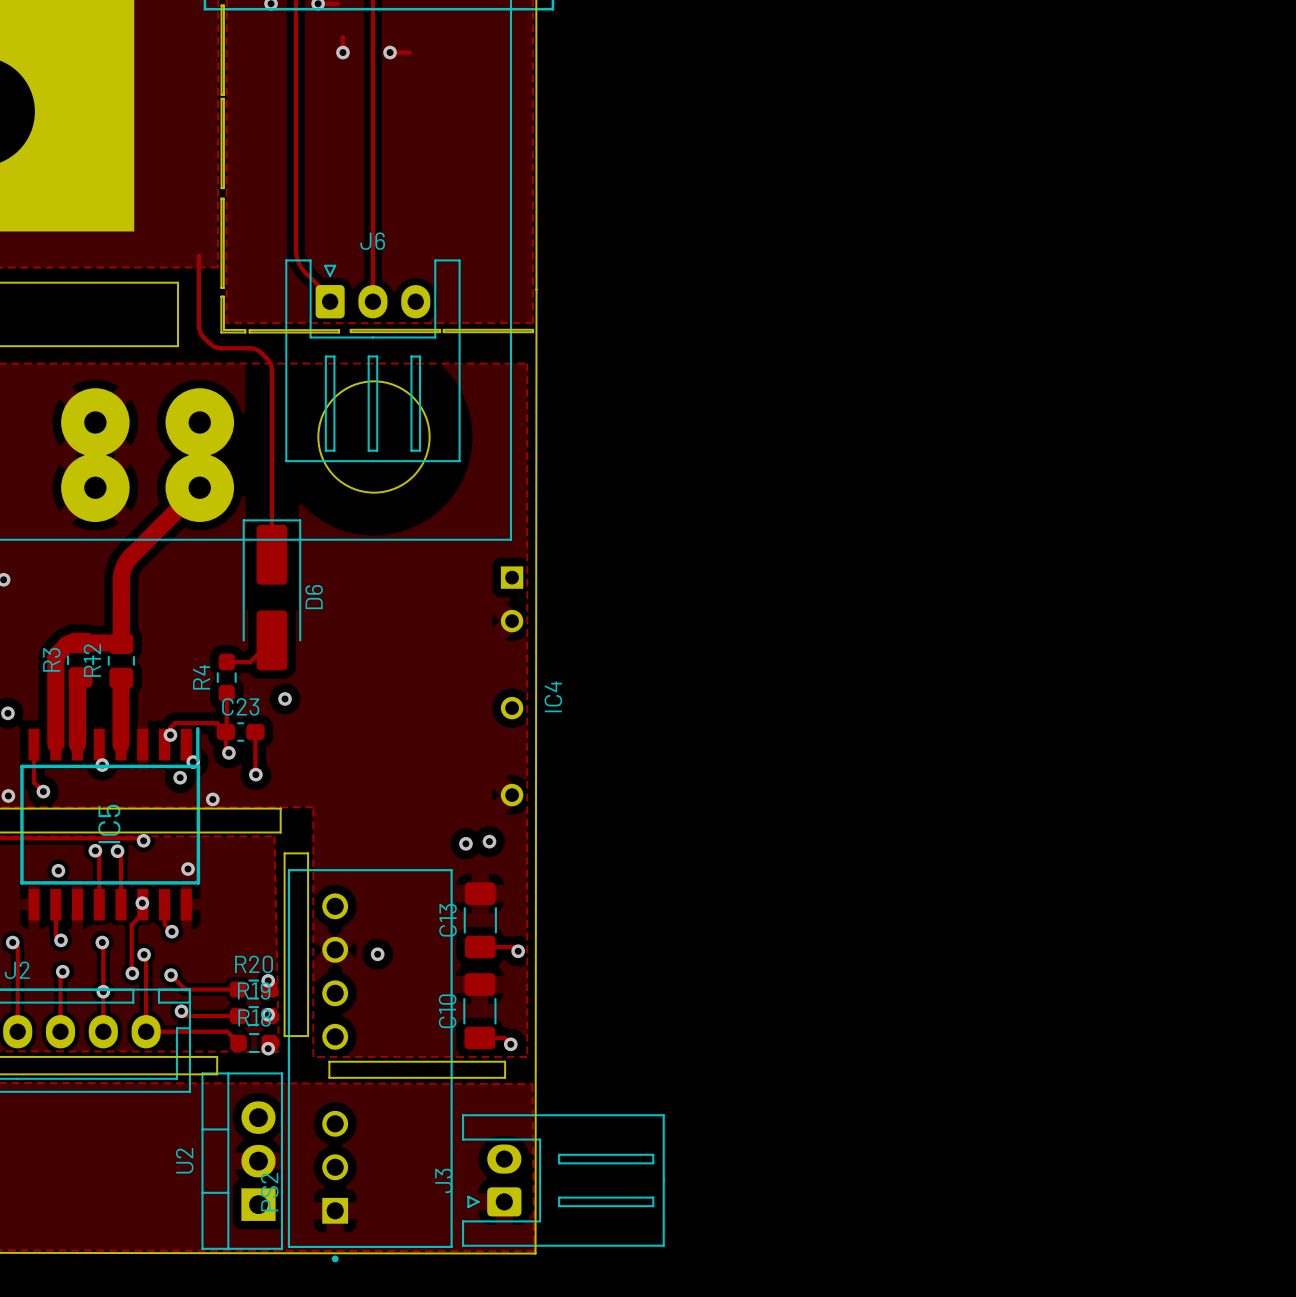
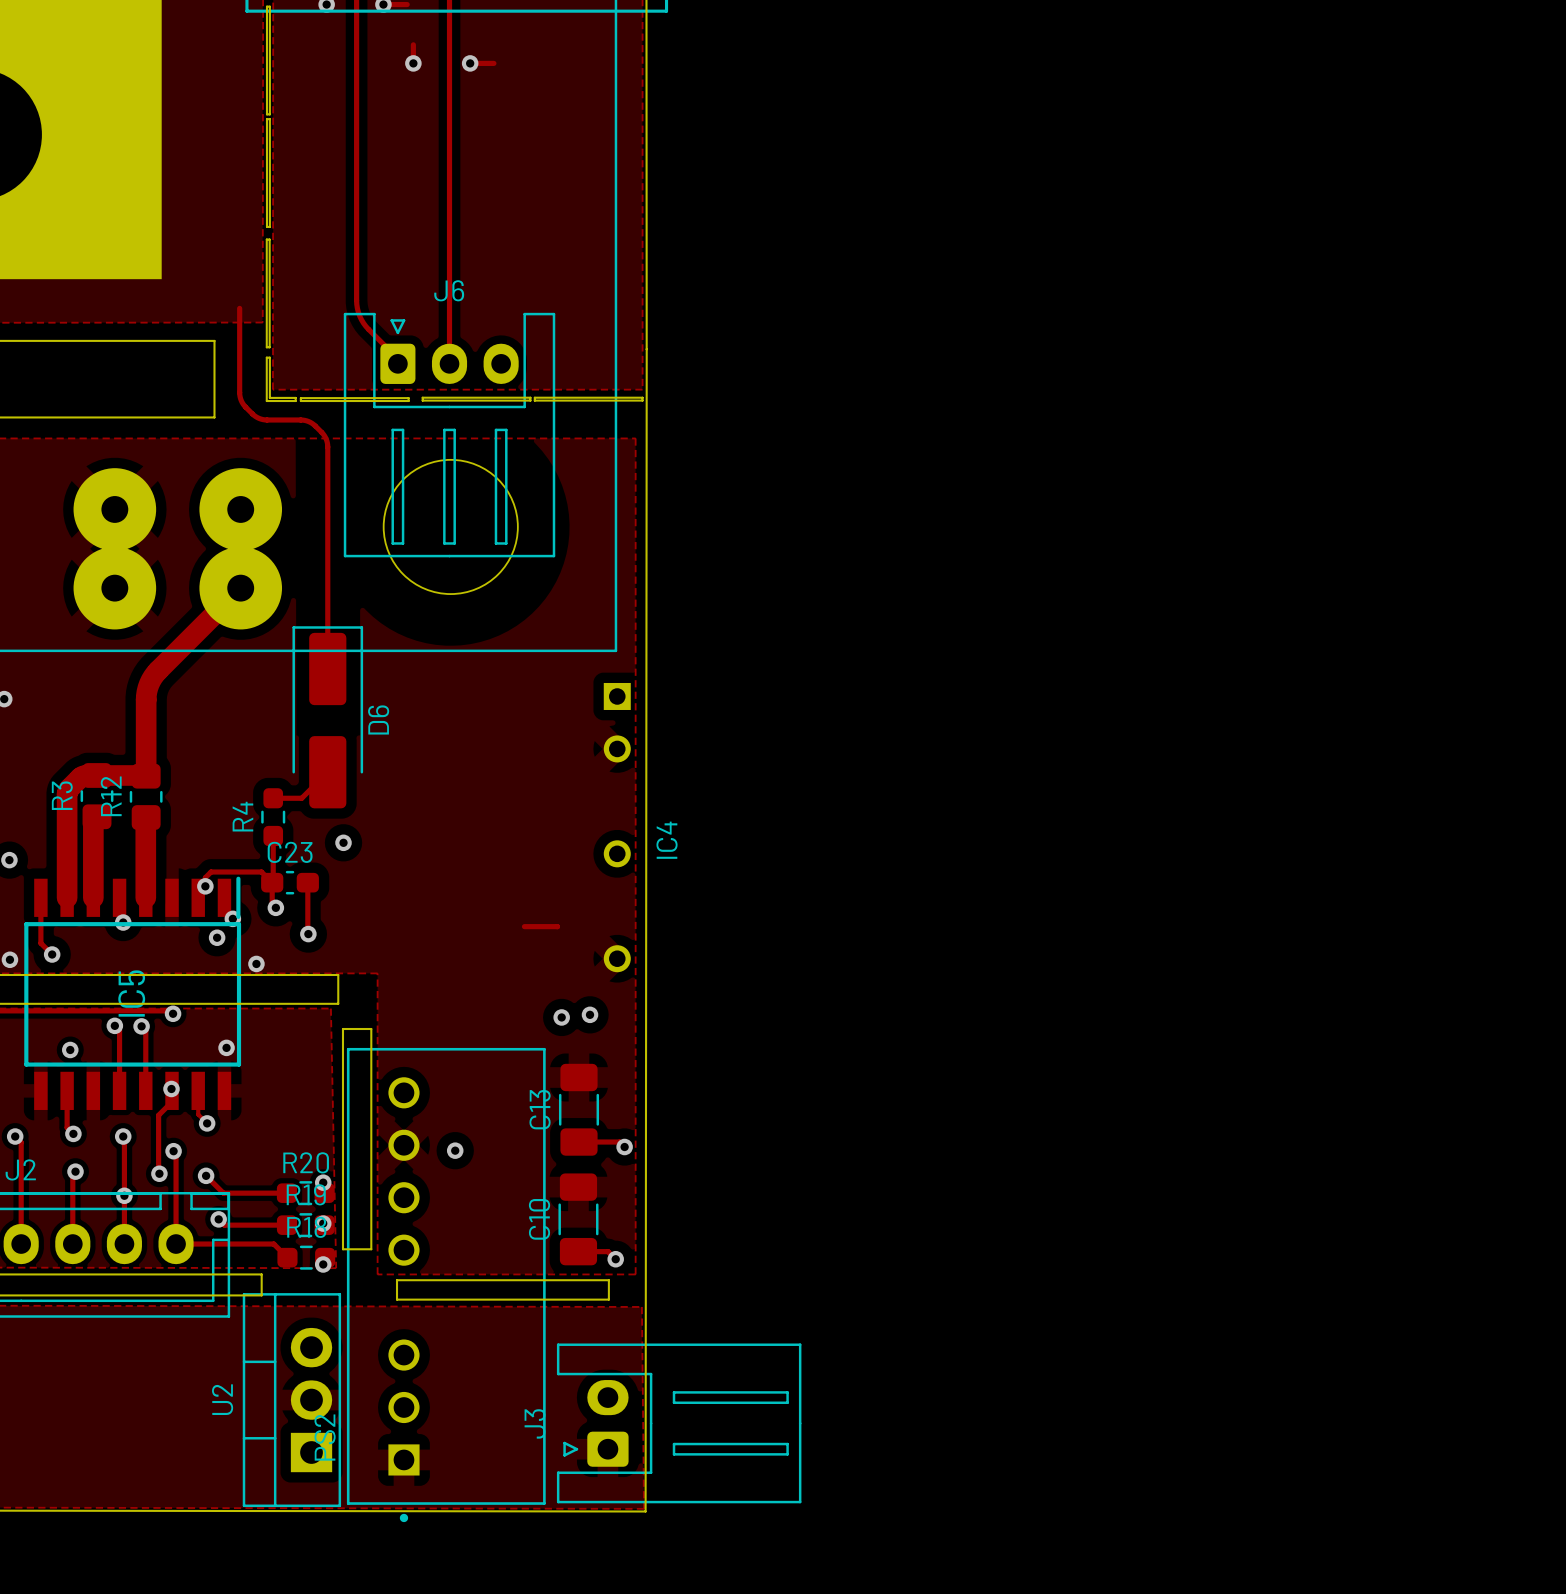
track: none -> (524, 926) (557, 926)

